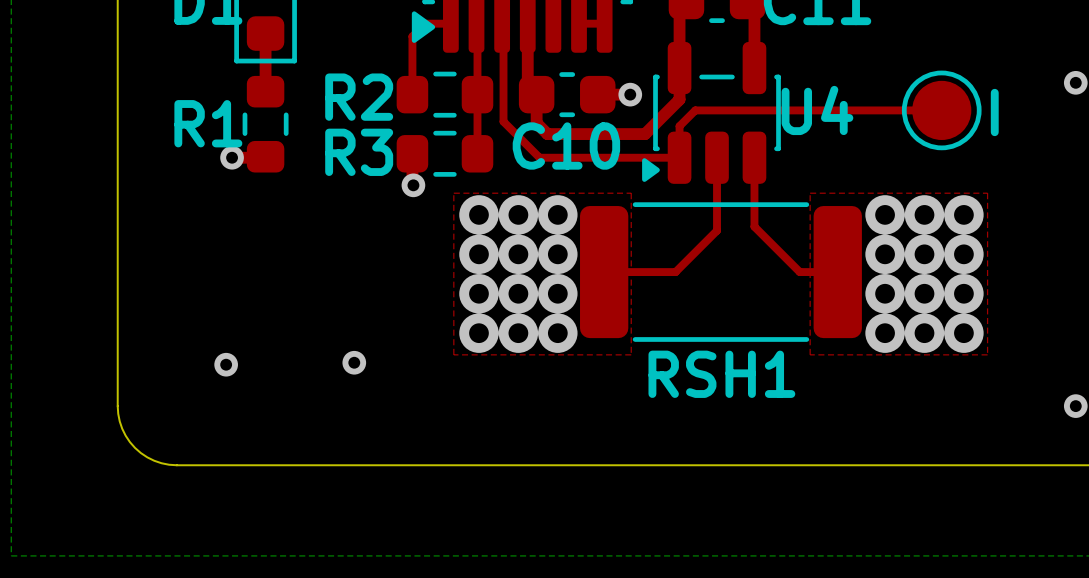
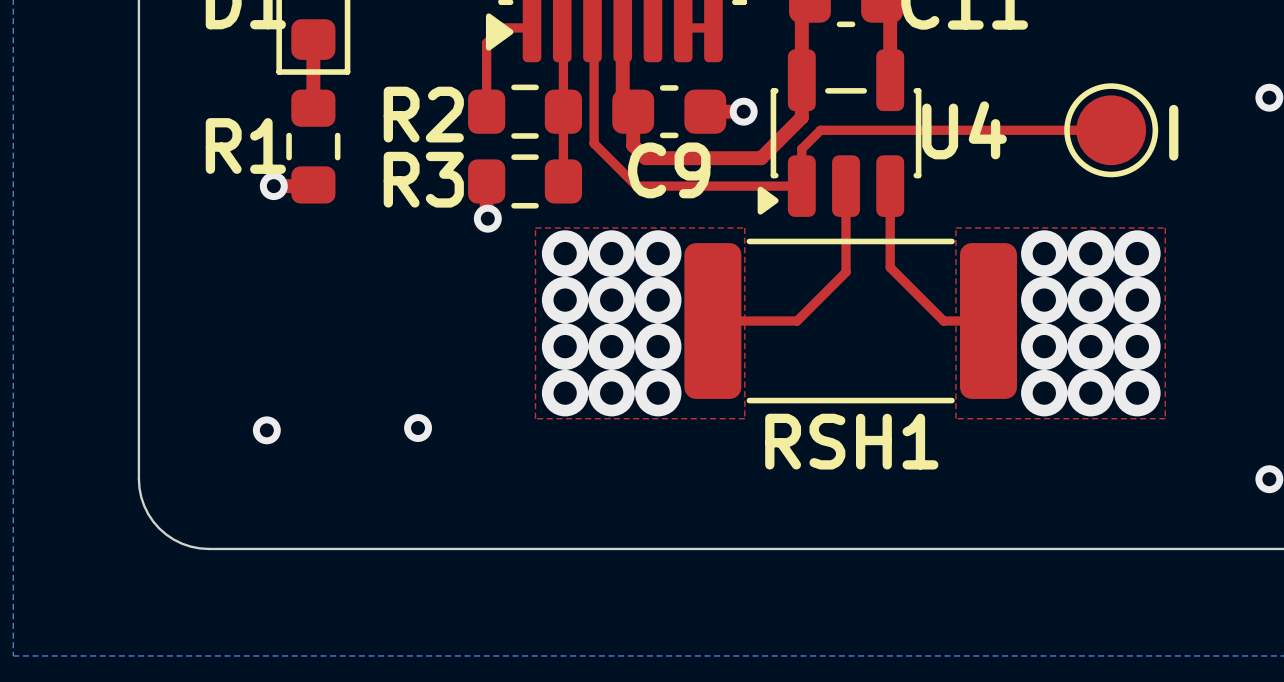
C10 name: C10 (566, 146) -> C9 (669, 170)

